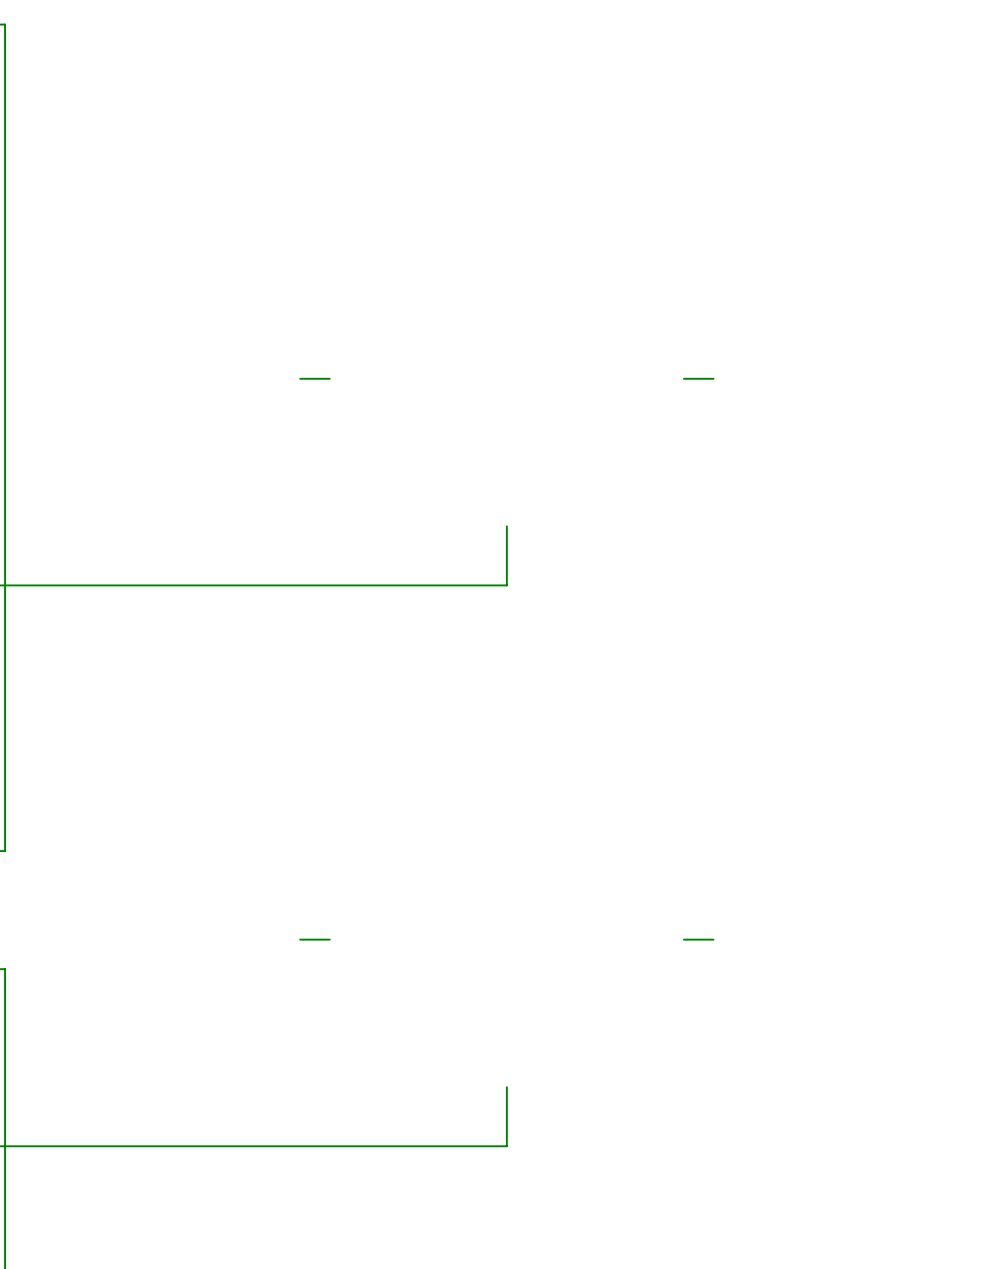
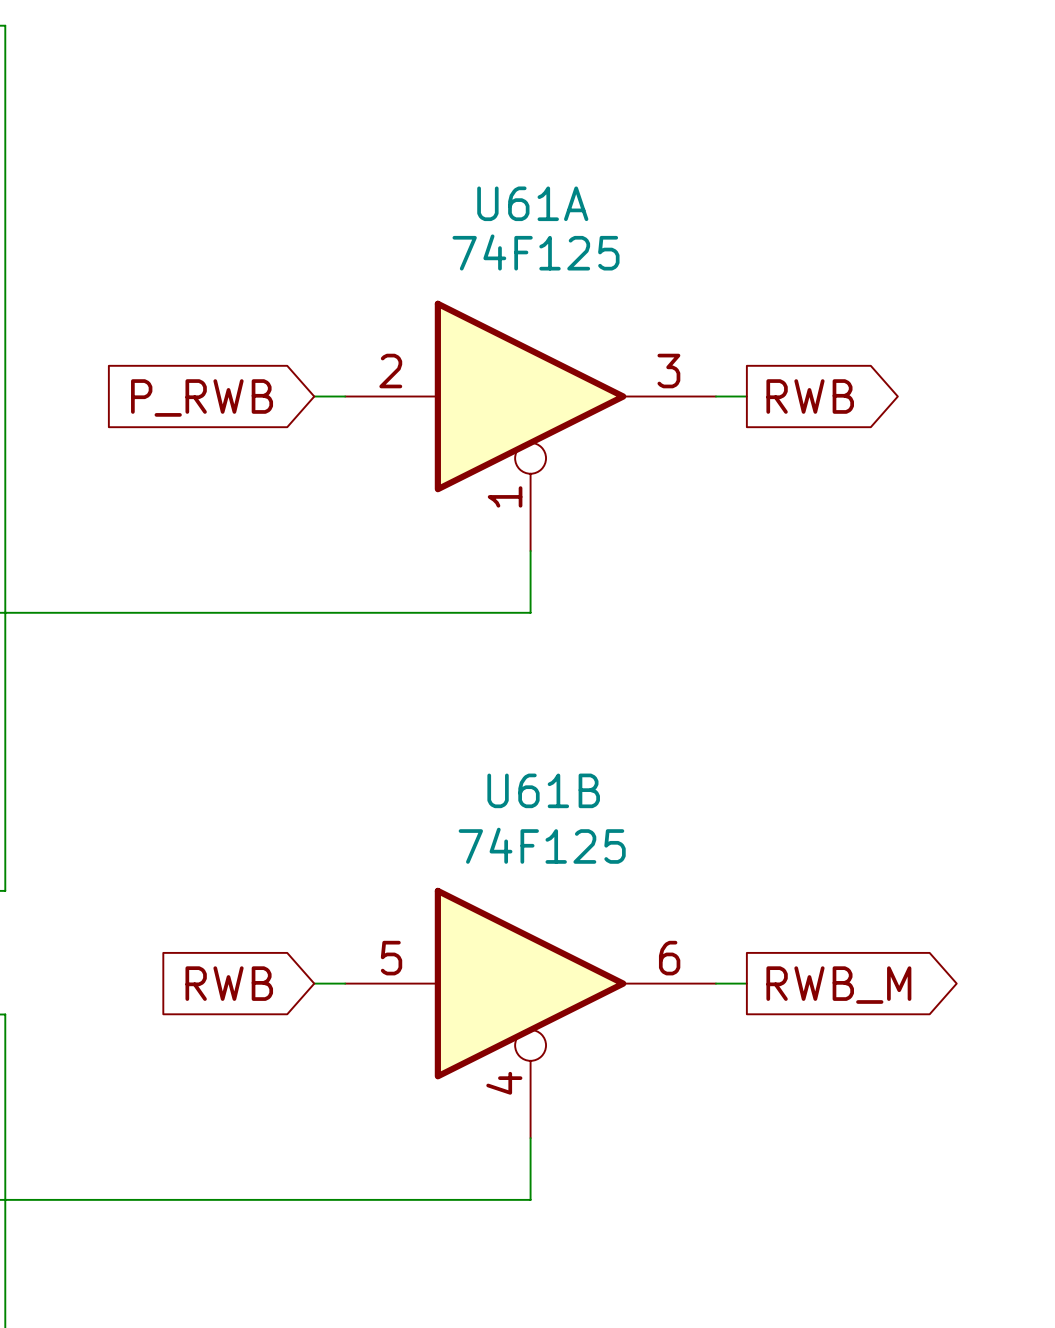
global label: none -> RWB (810, 396)
global label: none -> P_RWB (202, 397)
U61A: none -> 74F125 (530, 425)
global label: none -> RWB (229, 983)
global label: none -> RWB_M (838, 985)
U61B: none -> 74F125 (530, 1012)

